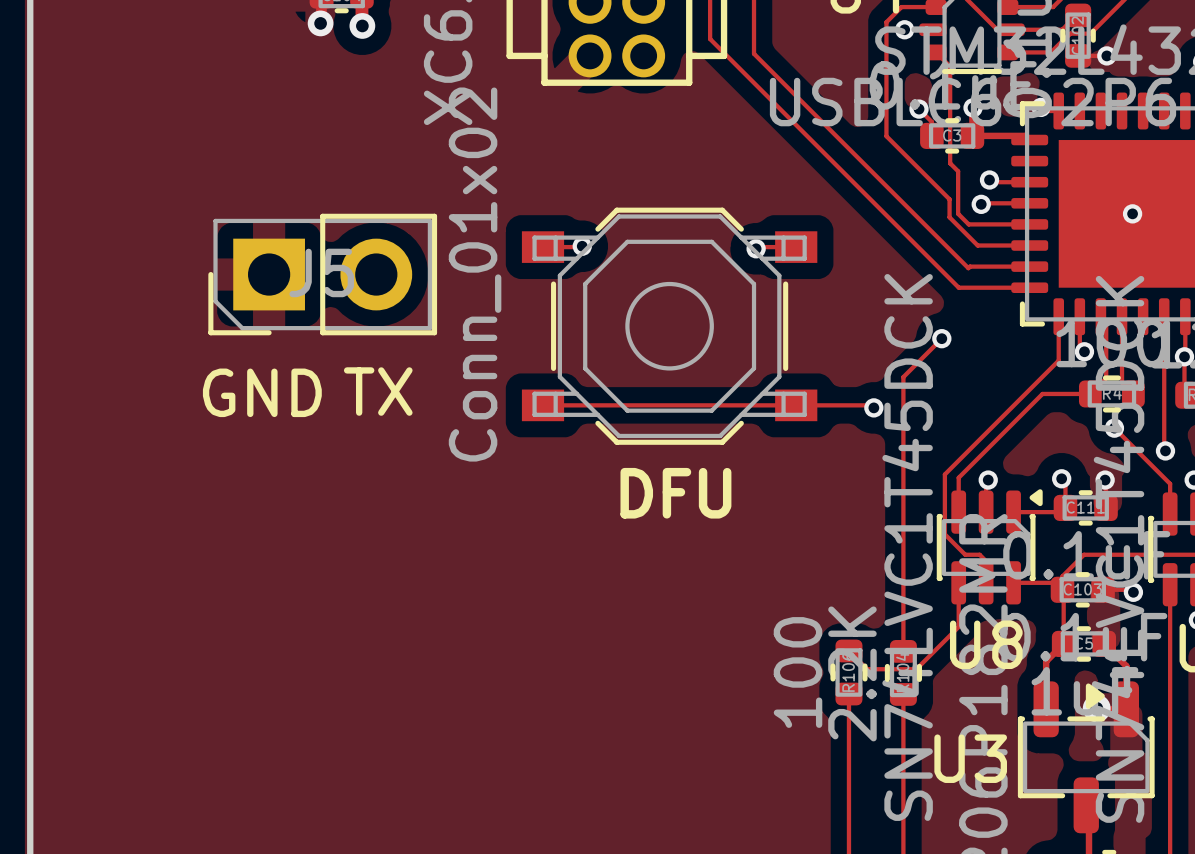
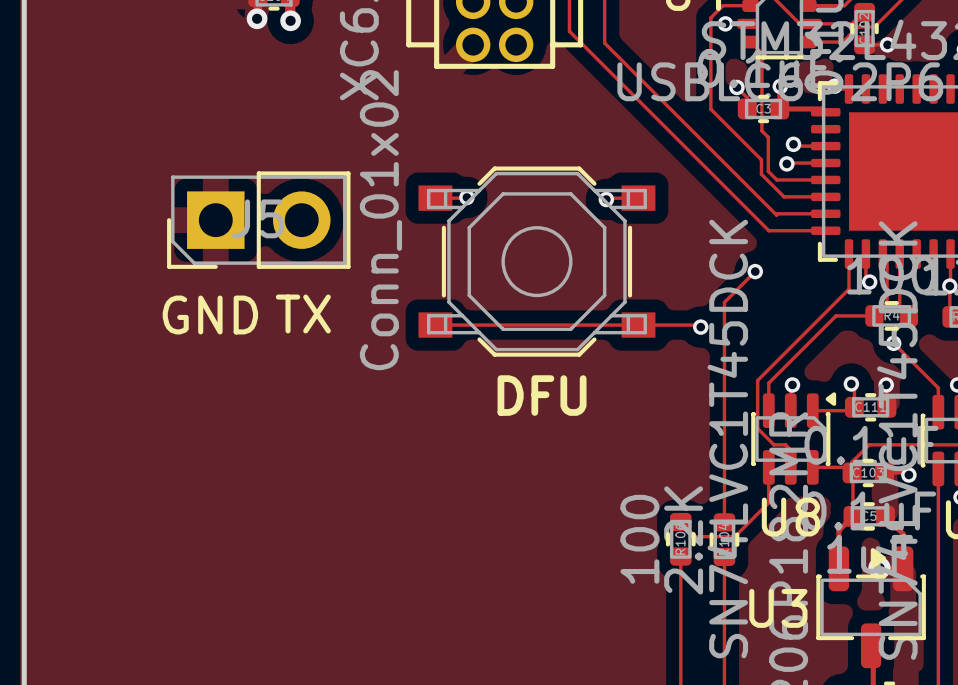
via: (1132, 213) -> none
track: (1164, 316) (1165, 450) -> none
via: (1165, 450) -> none

